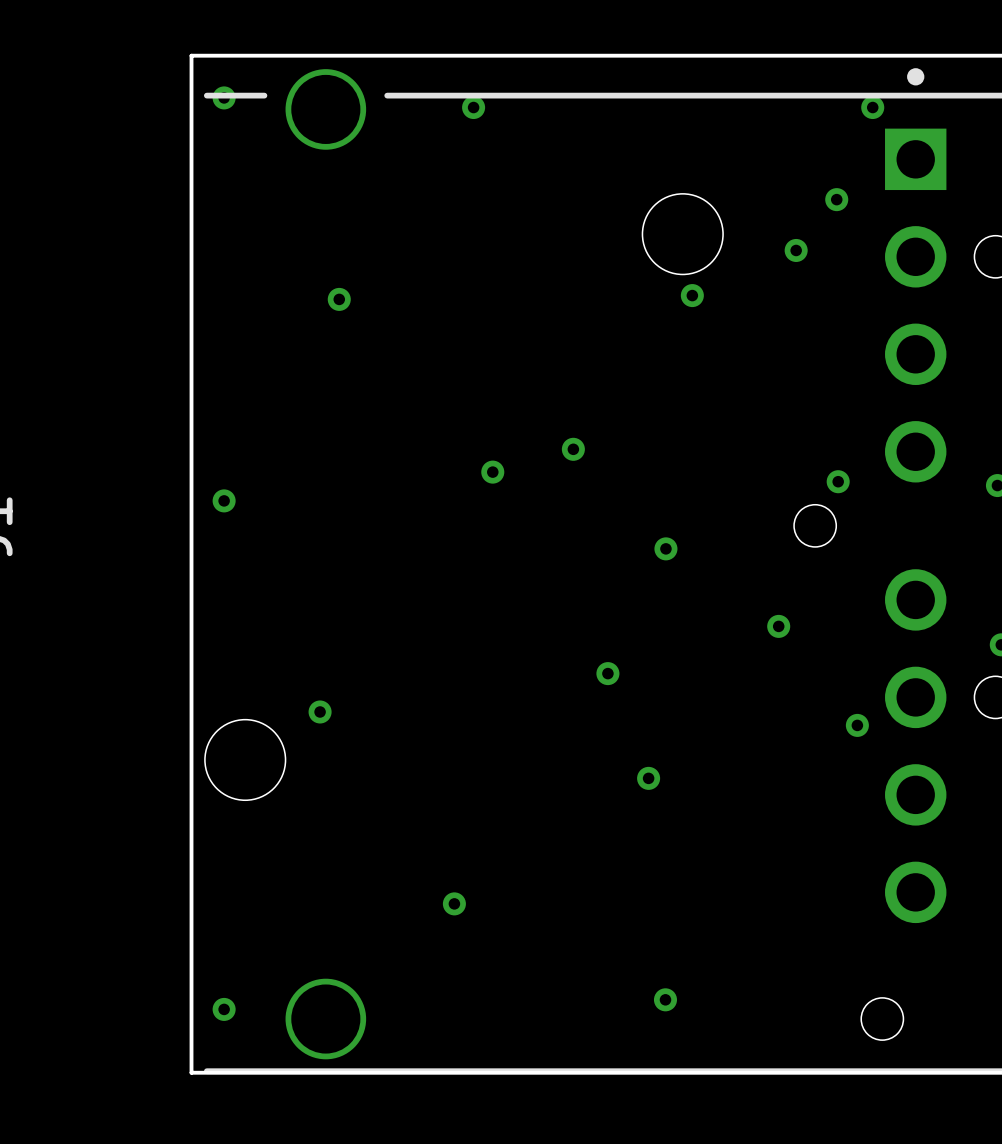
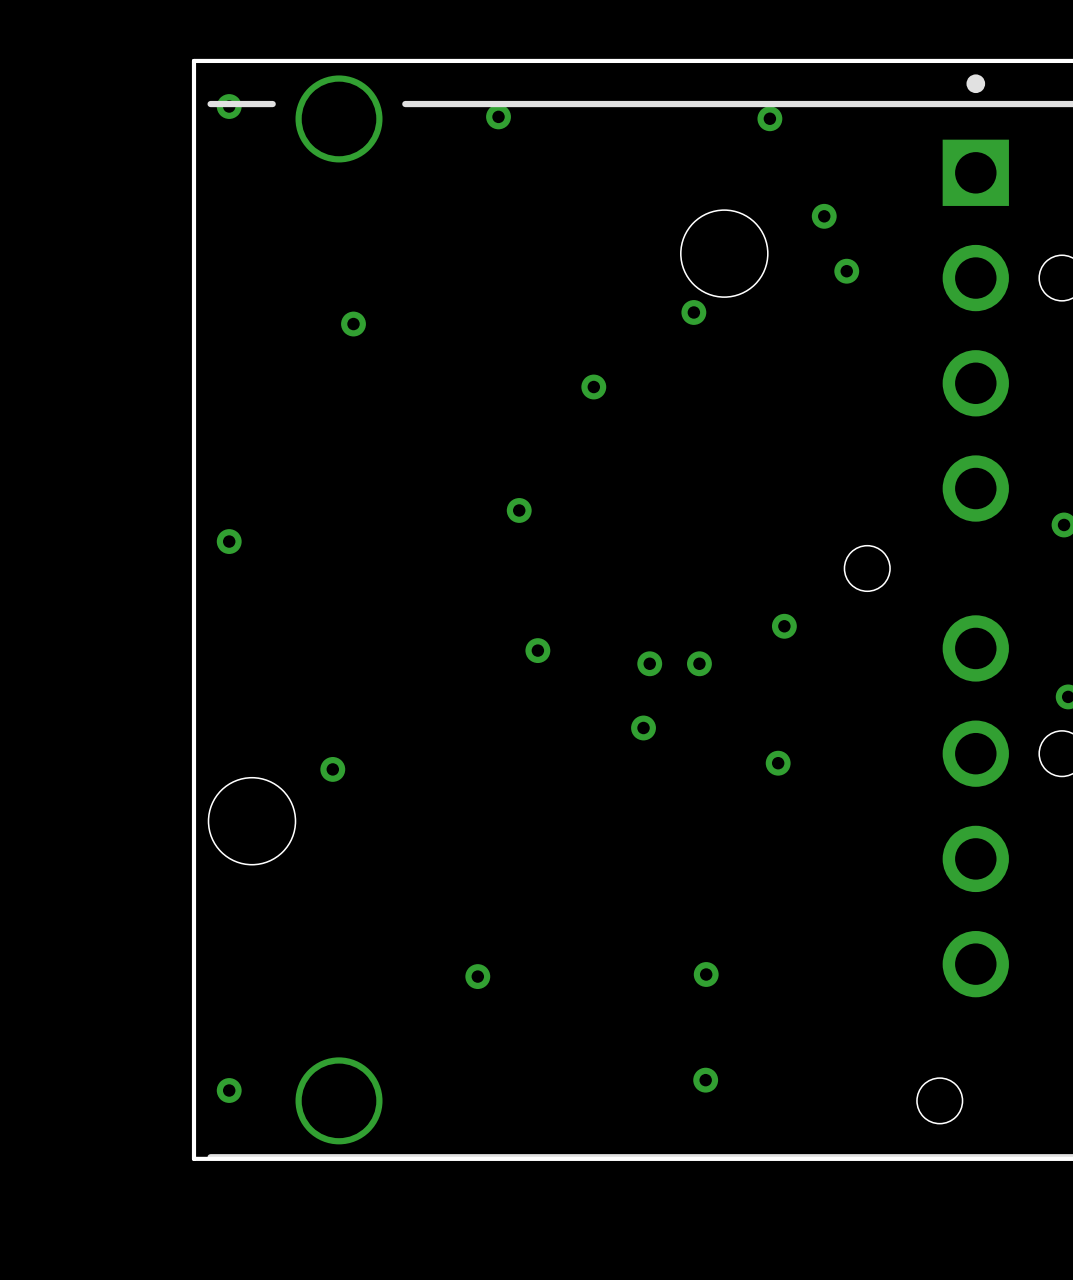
via: (872, 107) -> none
via: none -> (769, 118)
via position: (836, 199) -> (824, 216)
via position: (692, 295) -> (693, 312)
via: none -> (593, 387)
via: (573, 449) -> none
via: (838, 481) -> none
via: (665, 548) -> none
via: none -> (784, 626)
via: none -> (537, 650)
via: none -> (649, 663)
via: none -> (699, 663)
via: (778, 626) -> none
via: none -> (778, 763)
via: (857, 725) -> none
via: (648, 778) -> none
via: none -> (706, 974)

